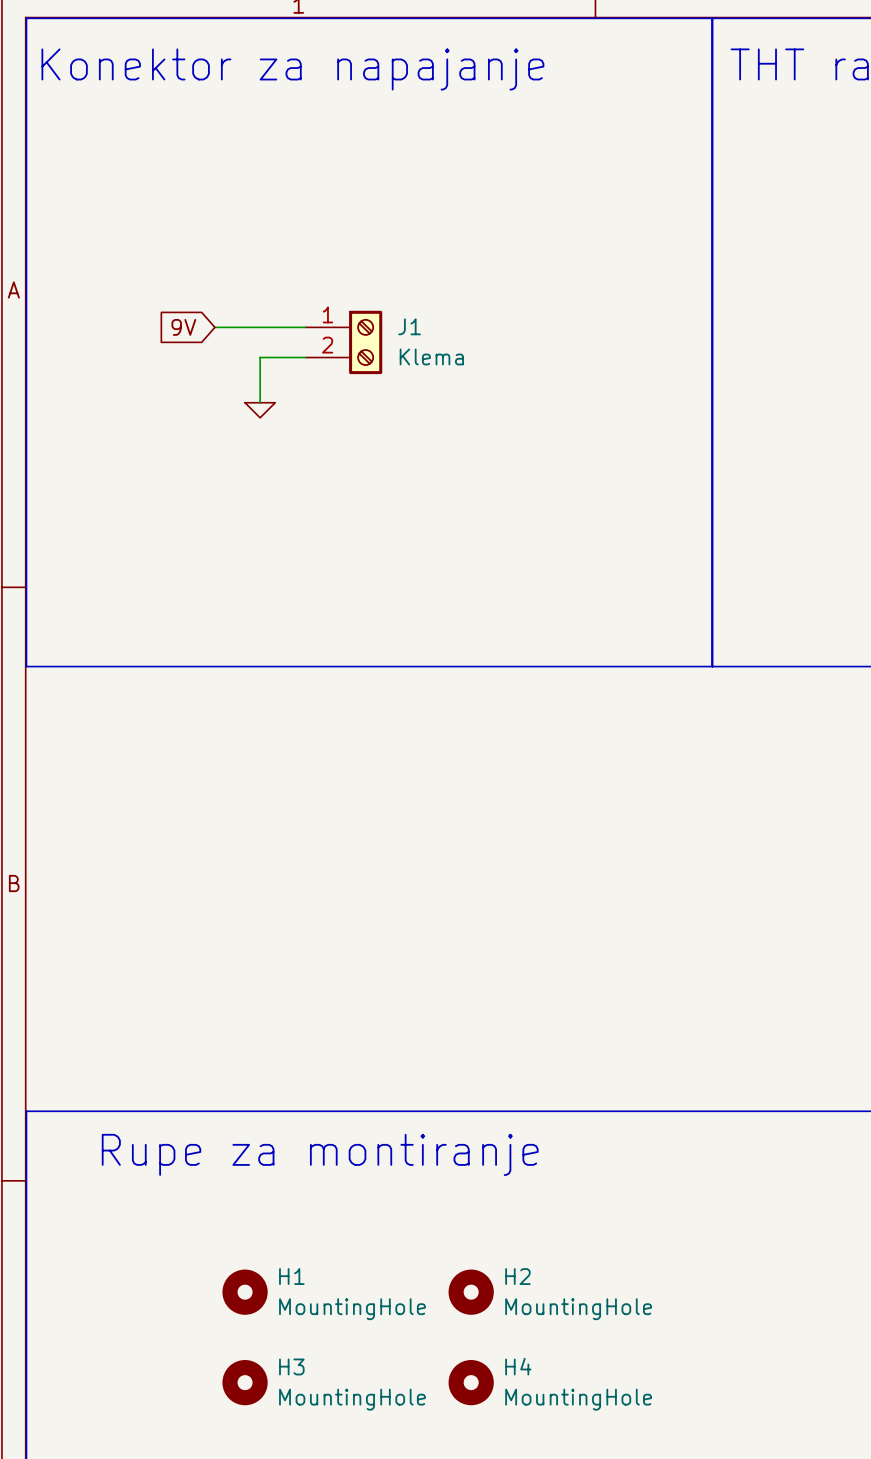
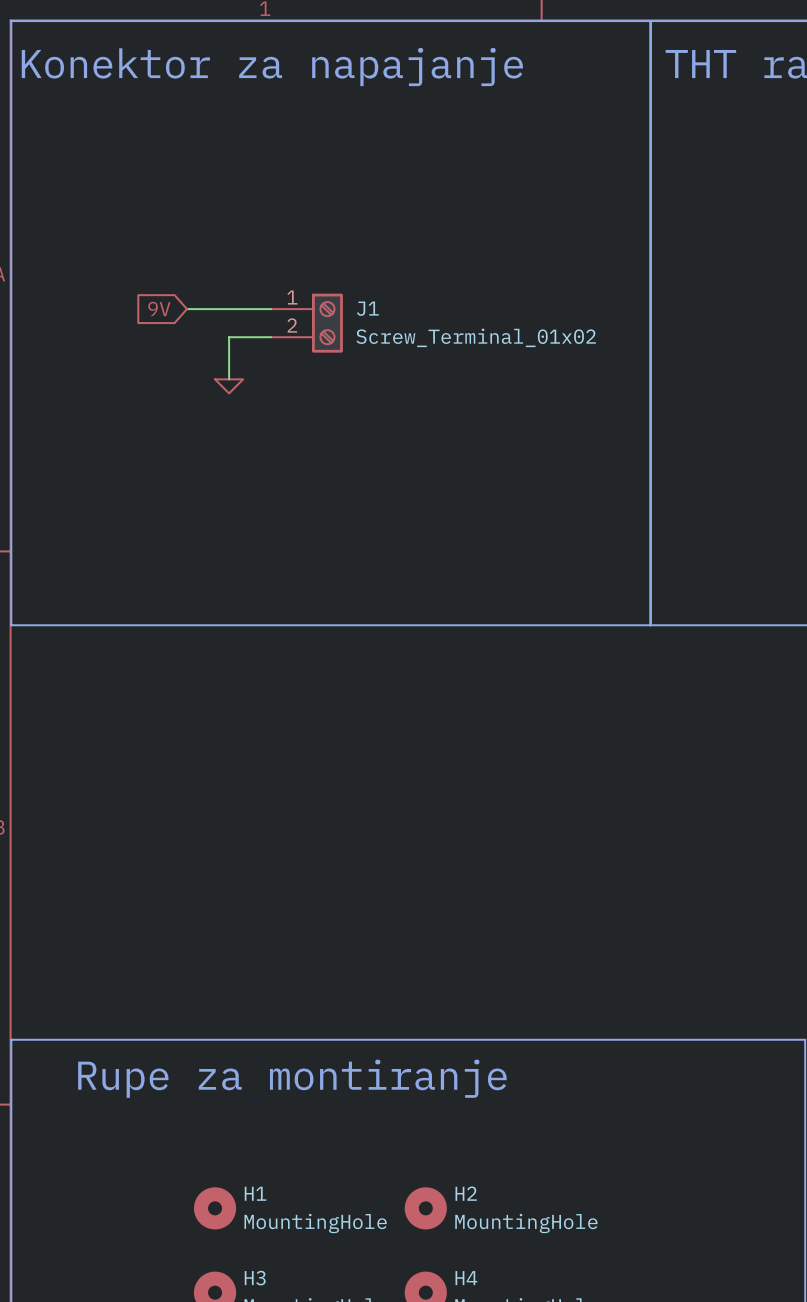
J1 value: Klema (431, 356) -> Screw_Terminal_01x02 (476, 337)

